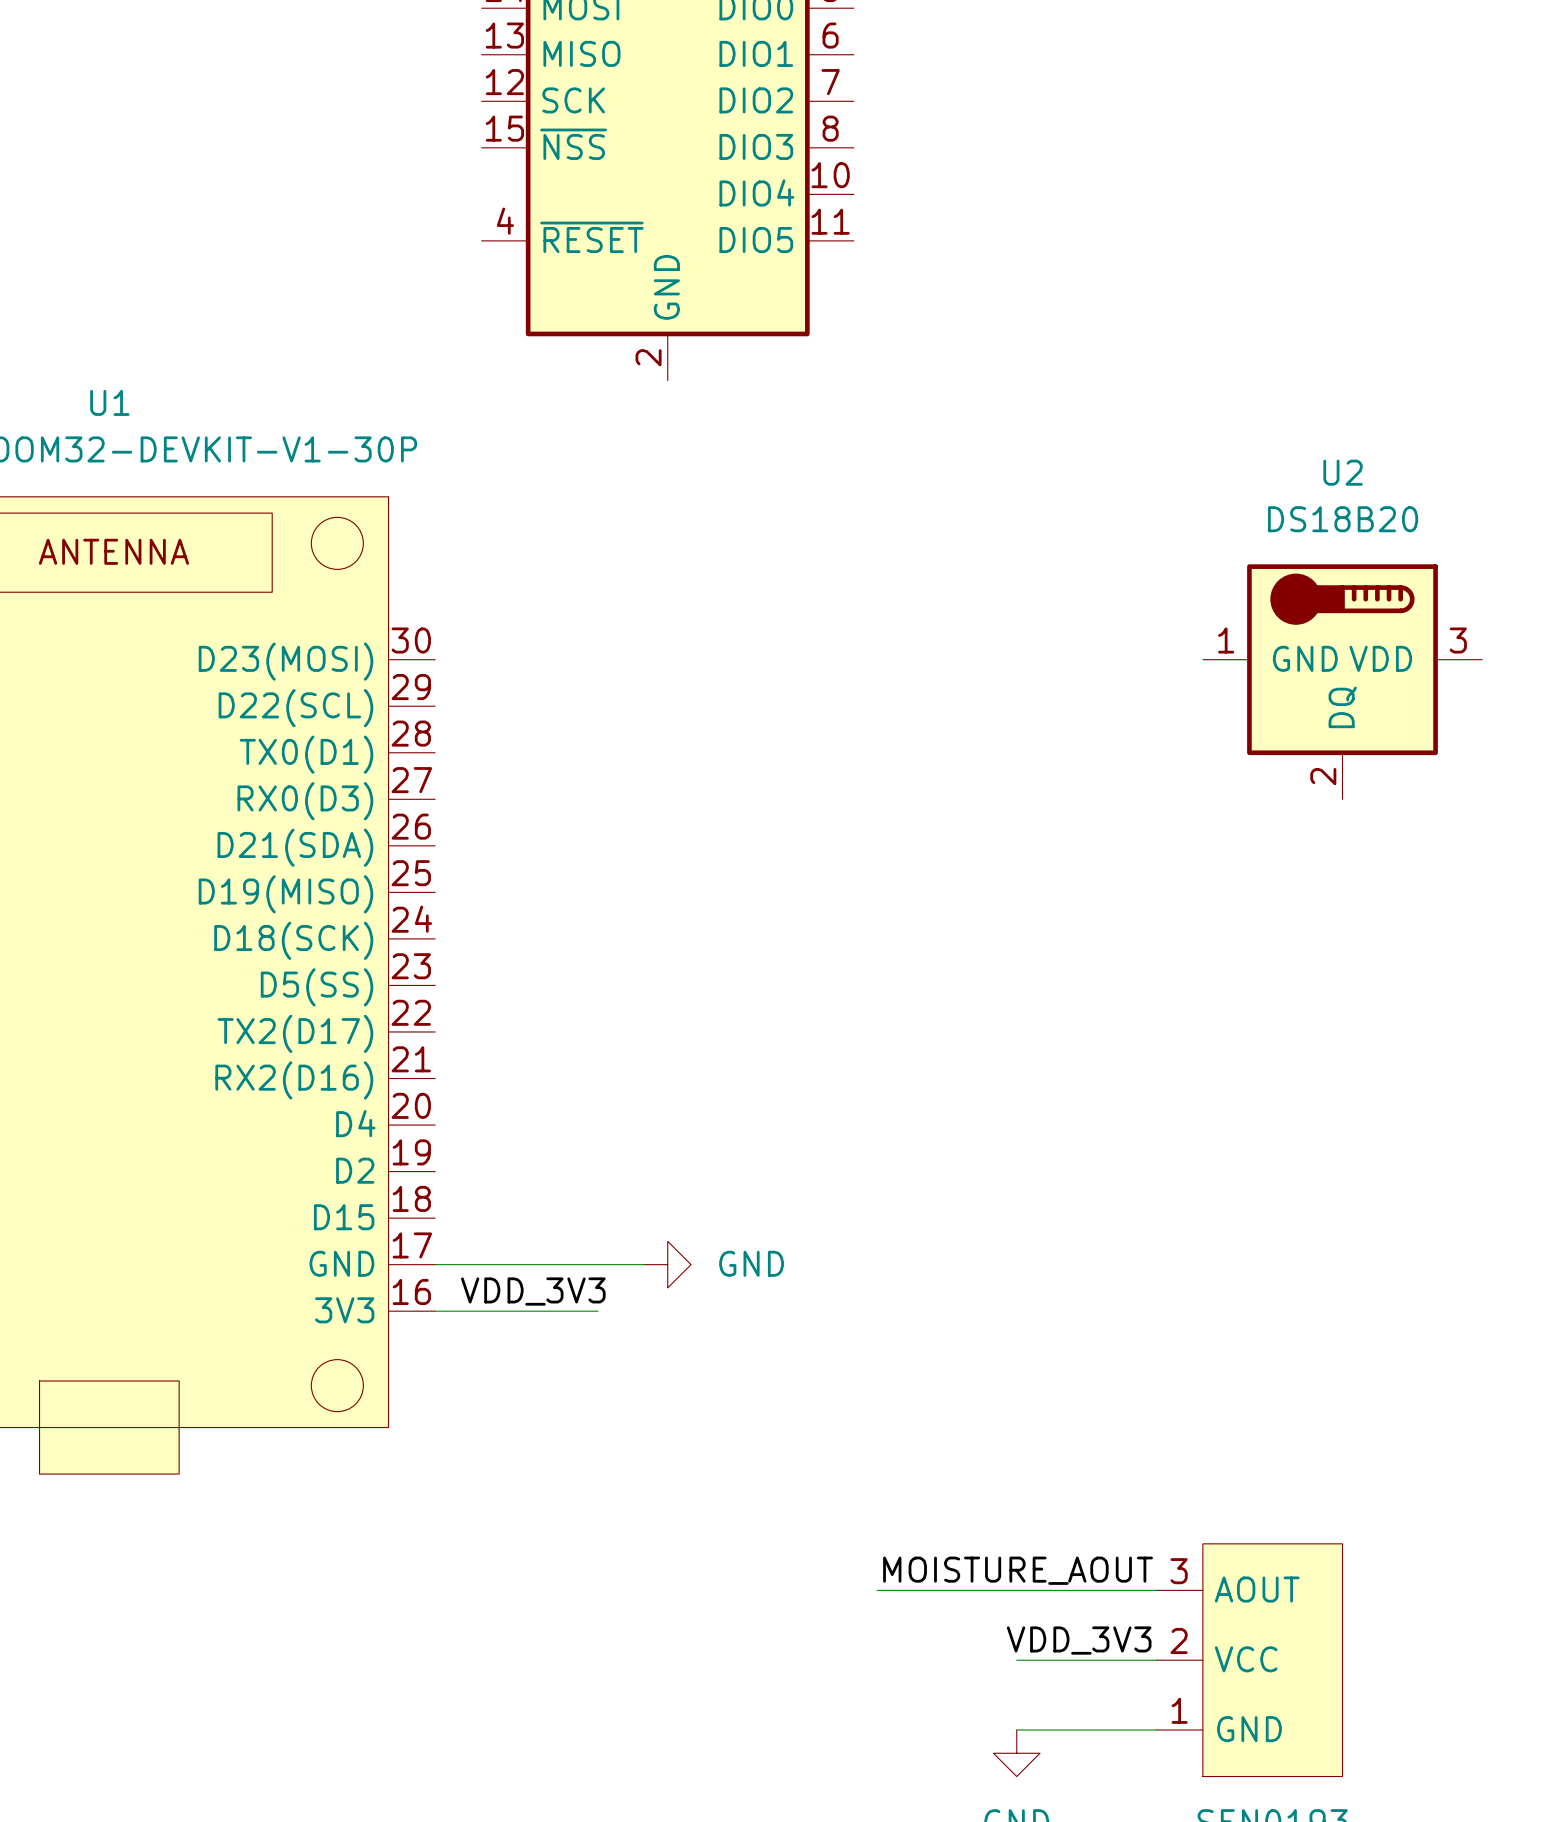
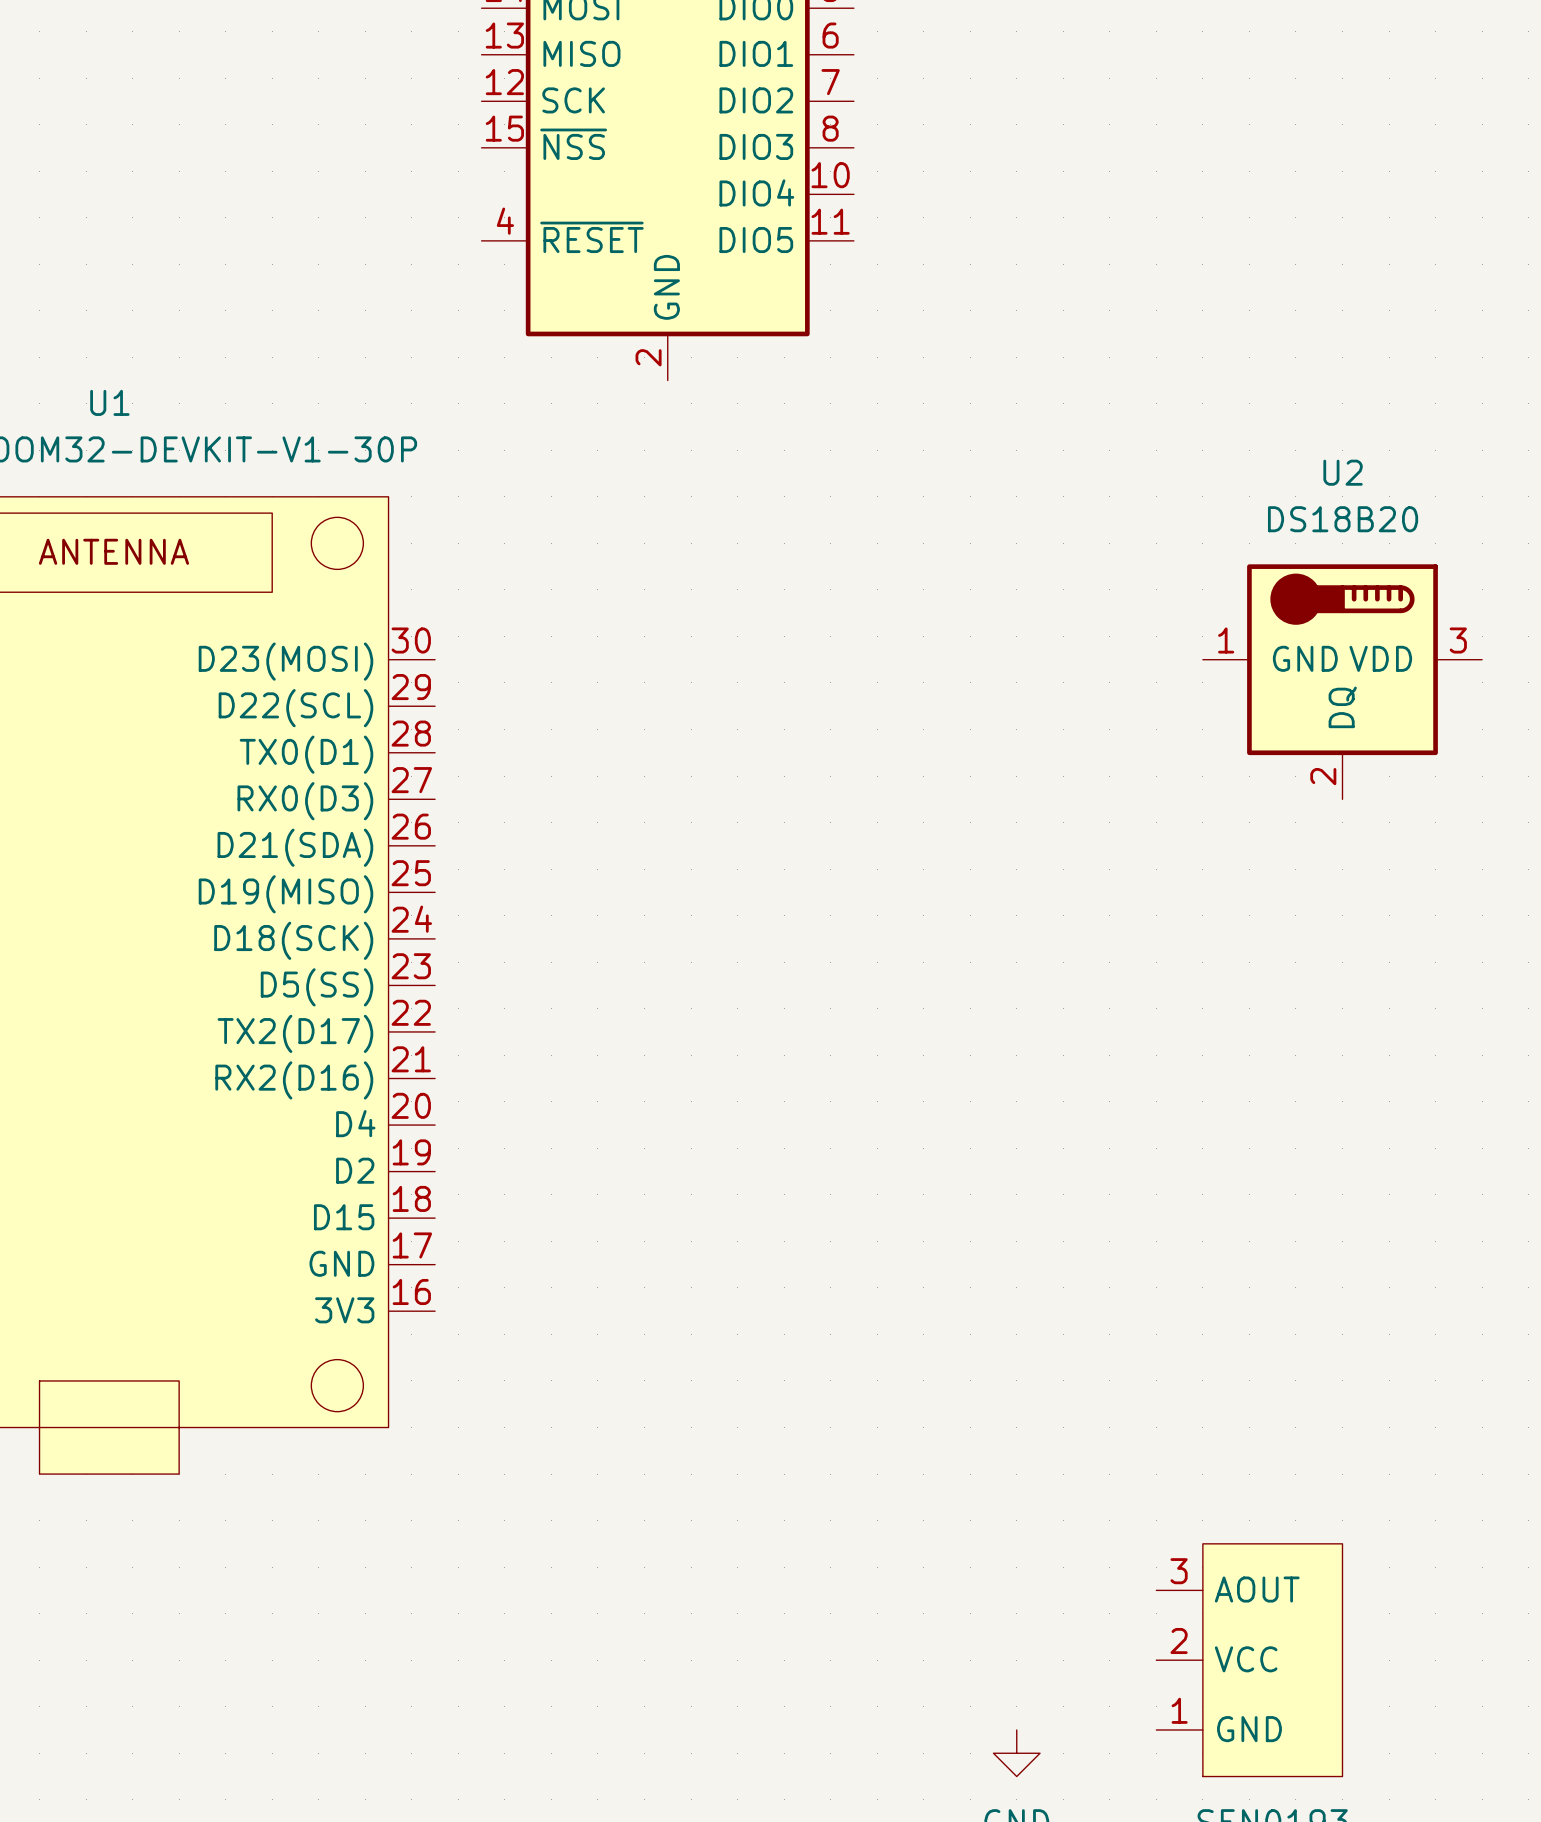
wire: (435, 1264) (644, 1264) -> none
power symbol: GND (667, 1264) -> none
label: VDD_3V3 (533, 1291) -> none
wire: (435, 1311) (597, 1311) -> none
label: MOISTURE_AOUT (1018, 1570) -> none
wire: (877, 1590) (1156, 1590) -> none
label: VDD_3V3 (1079, 1640) -> none
wire: (1016, 1660) (1156, 1660) -> none
wire: (1016, 1729) (1156, 1729) -> none

